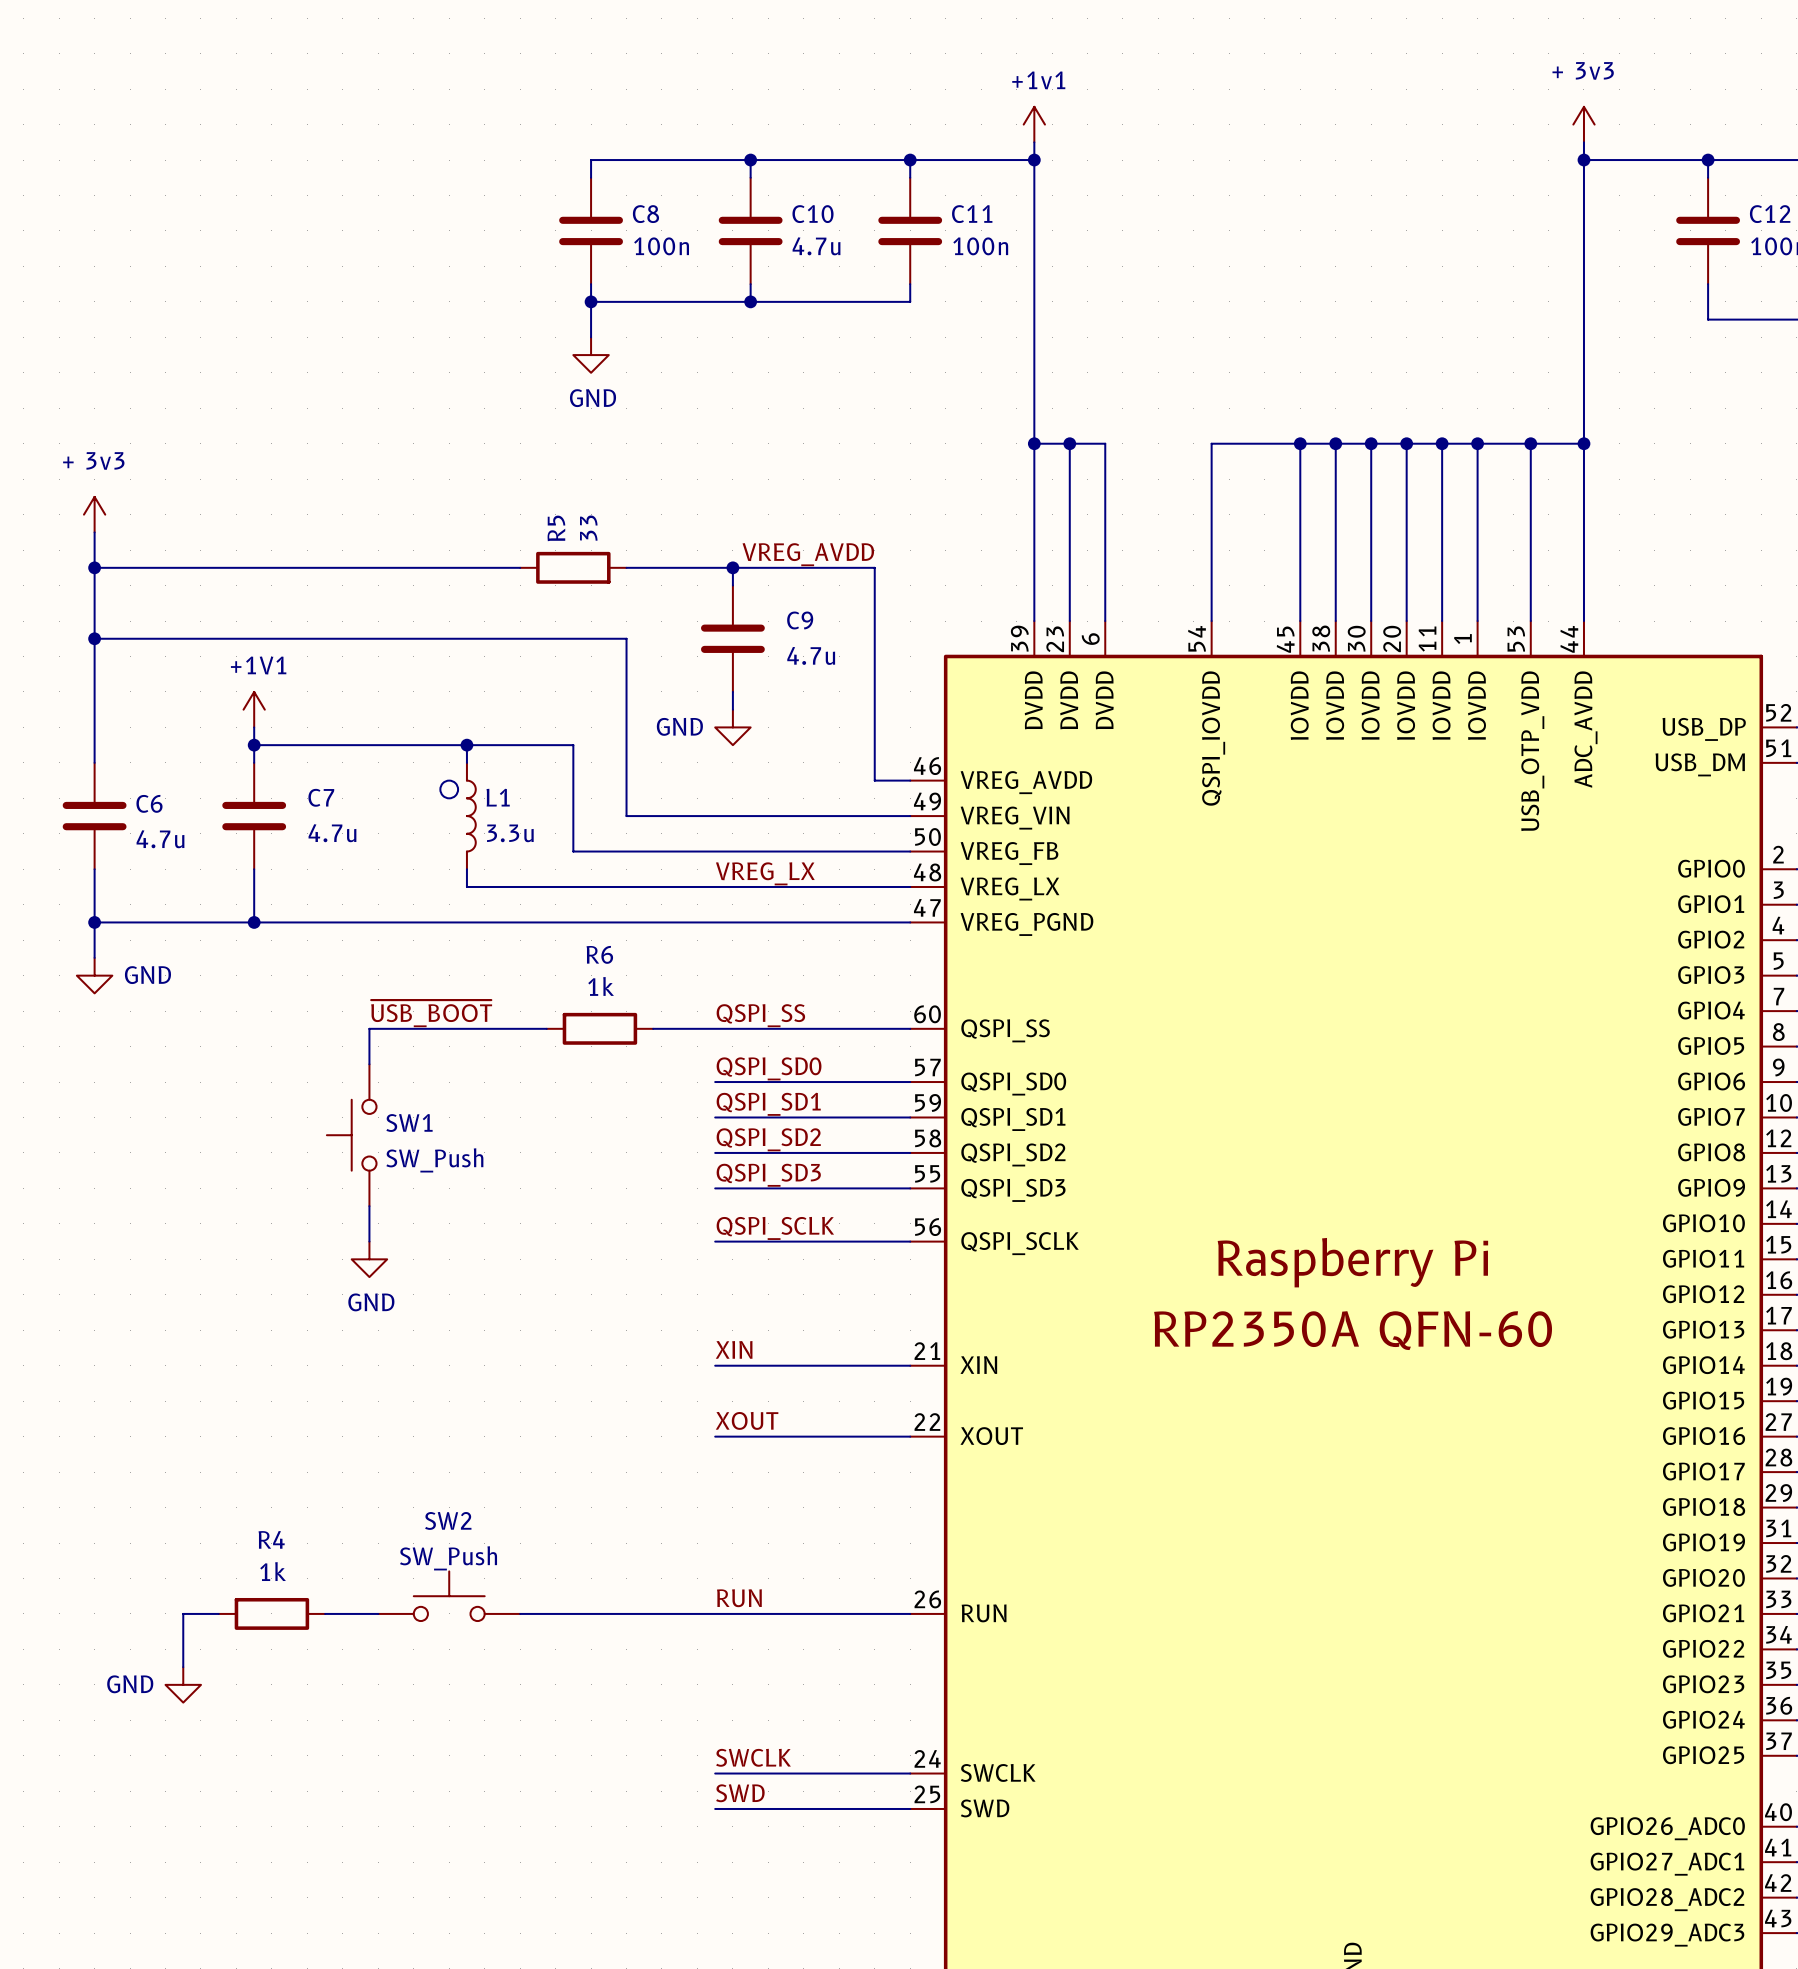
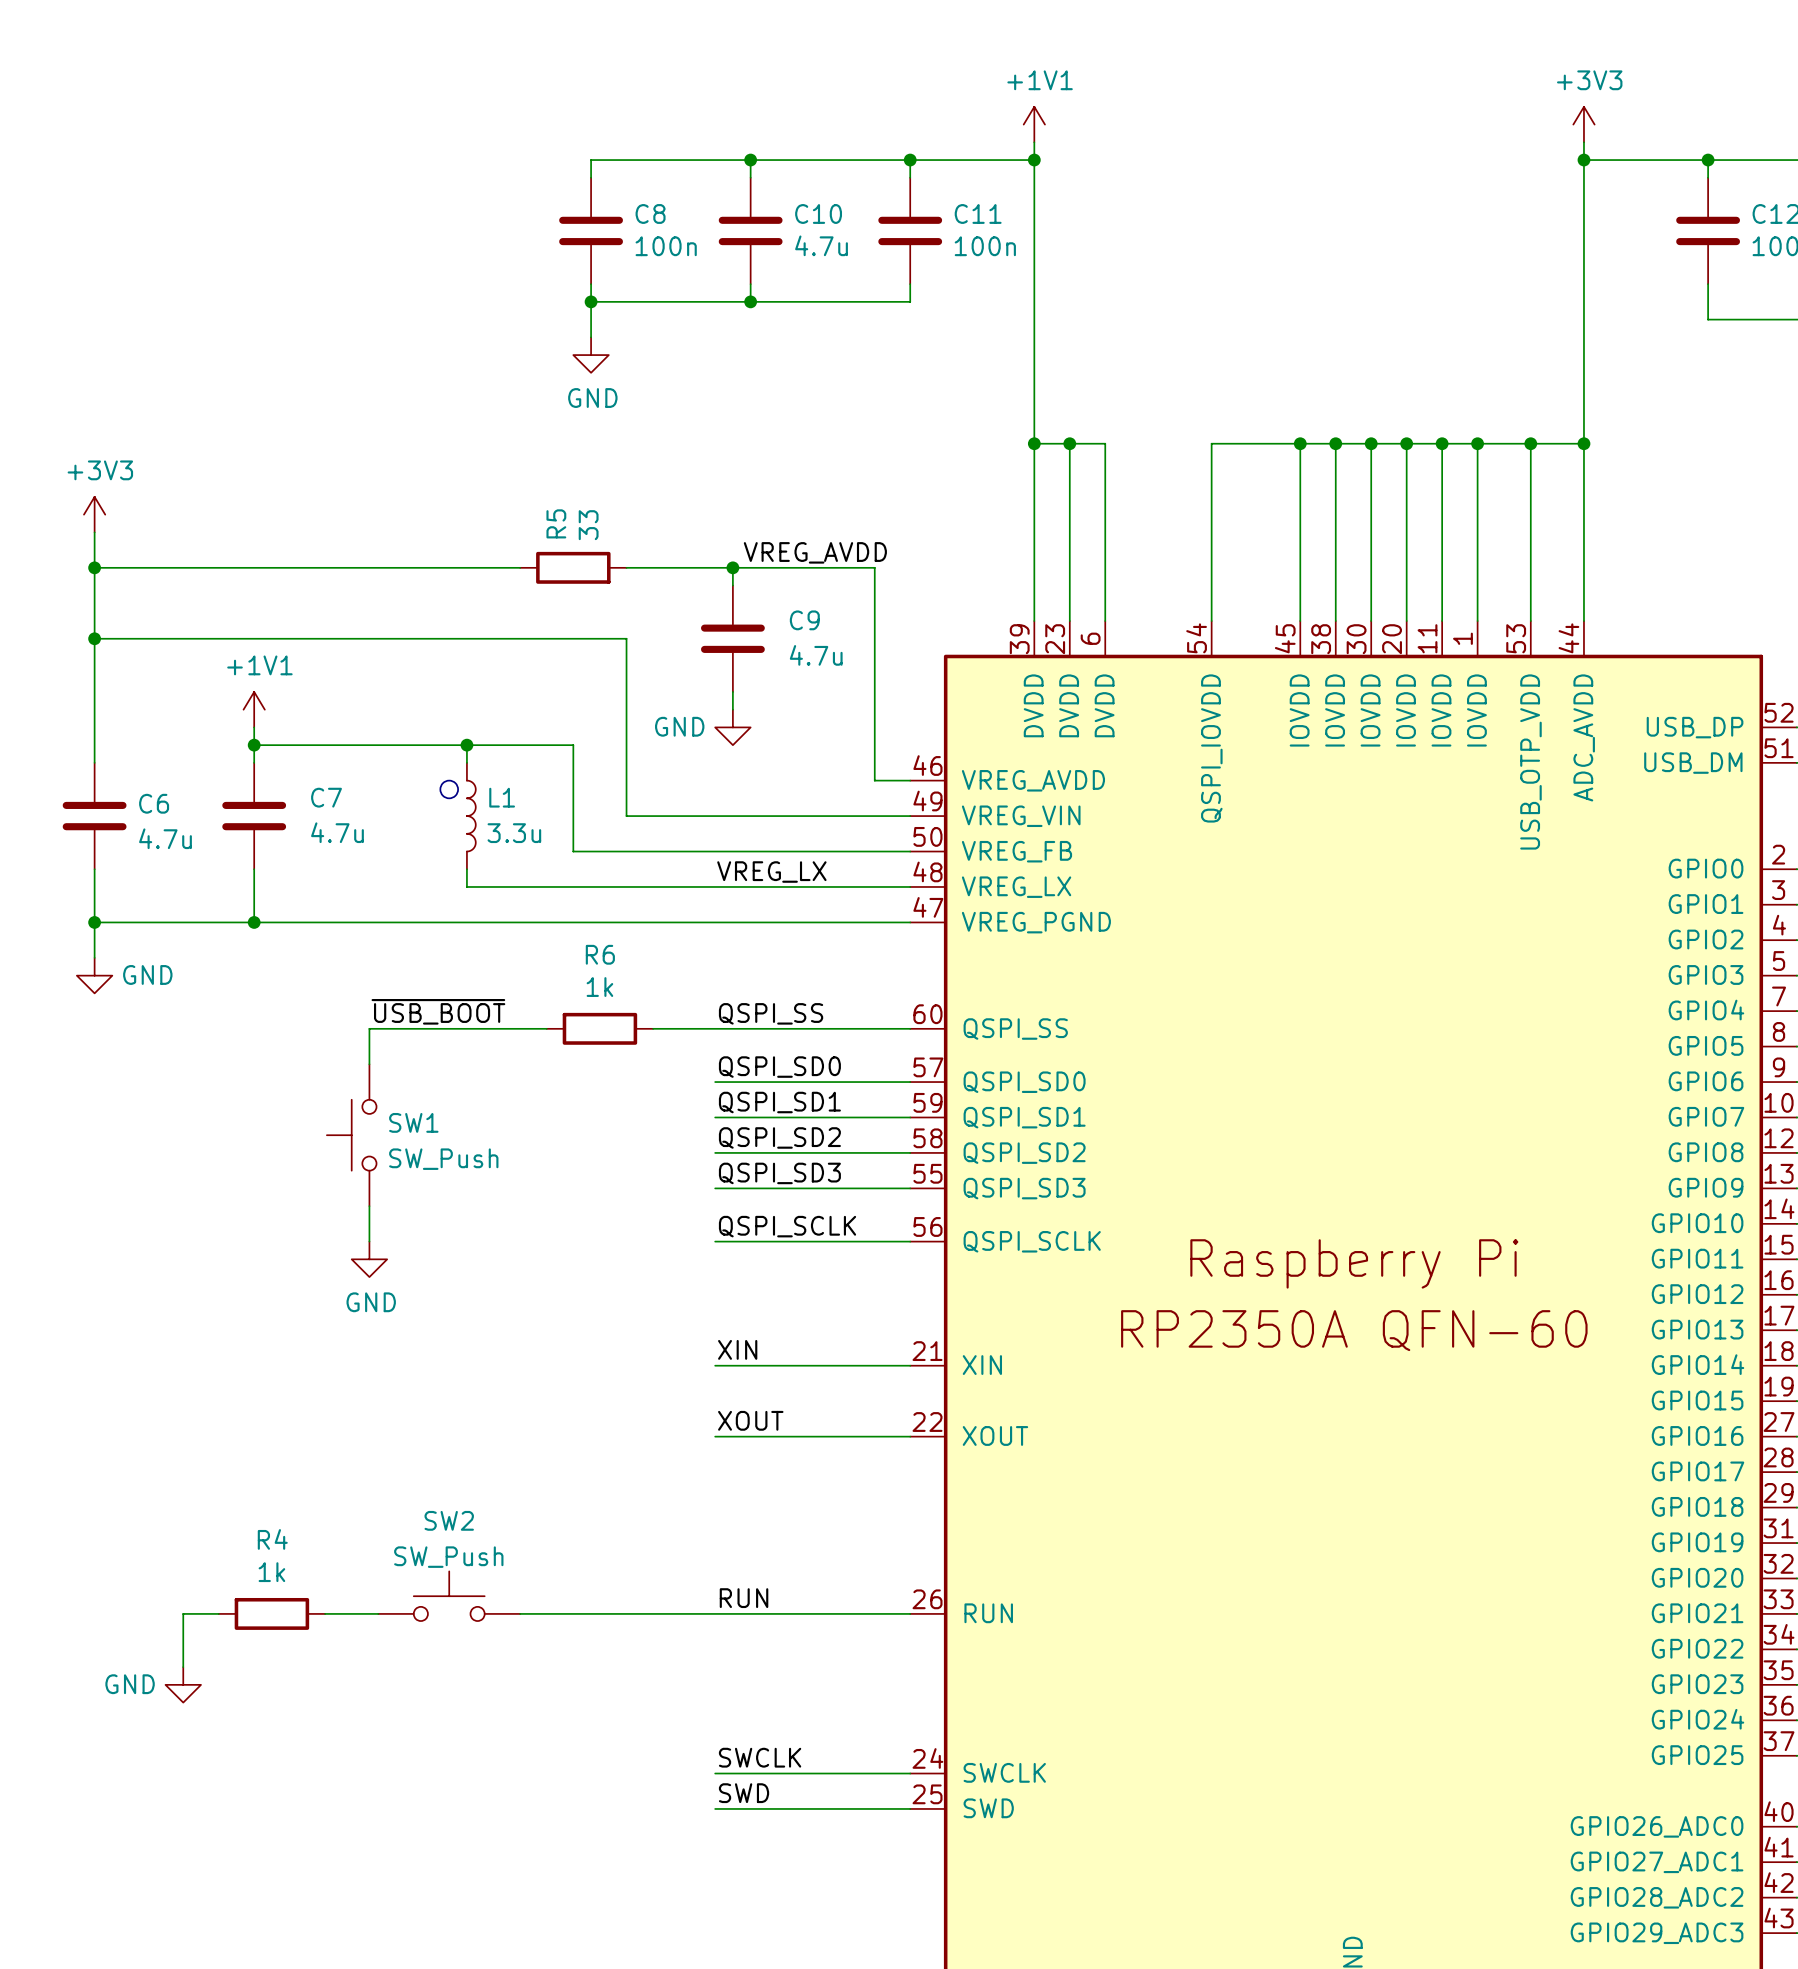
power symbol: +1v1 (1034, 124) -> +1V1 (1034, 124)
power symbol: + 3v3 (1583, 124) -> +3V3 (1583, 124)
power symbol: + 3v3 (94, 514) -> +3V3 (94, 514)

